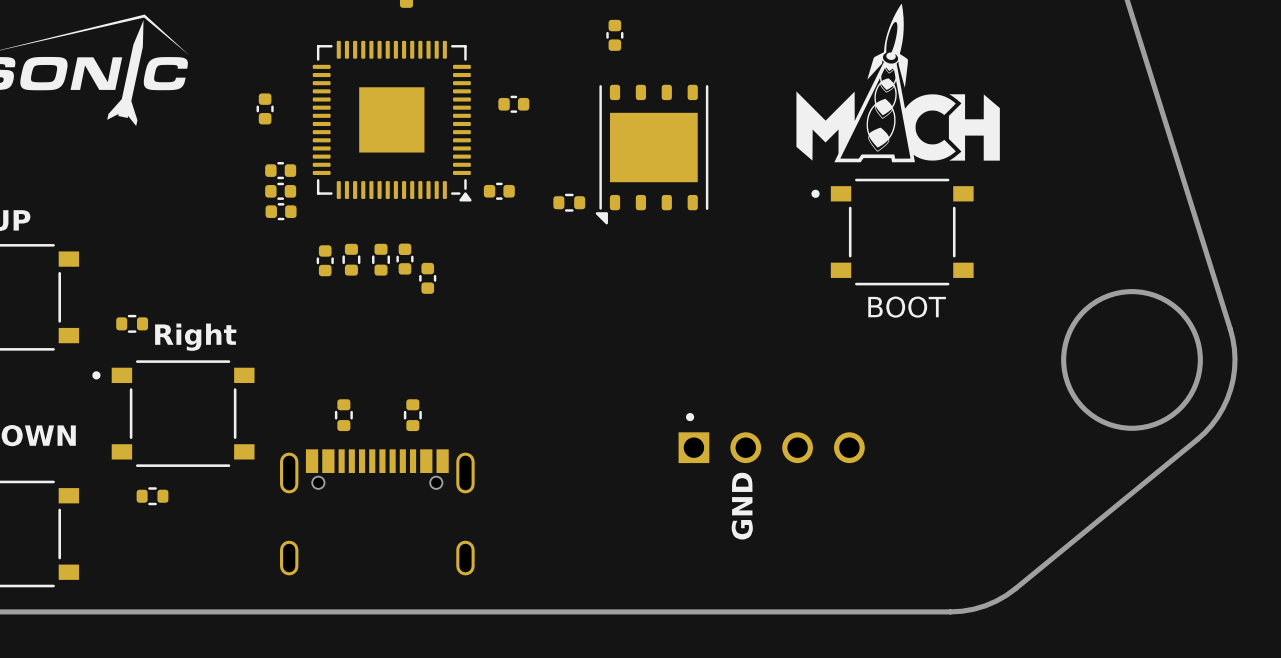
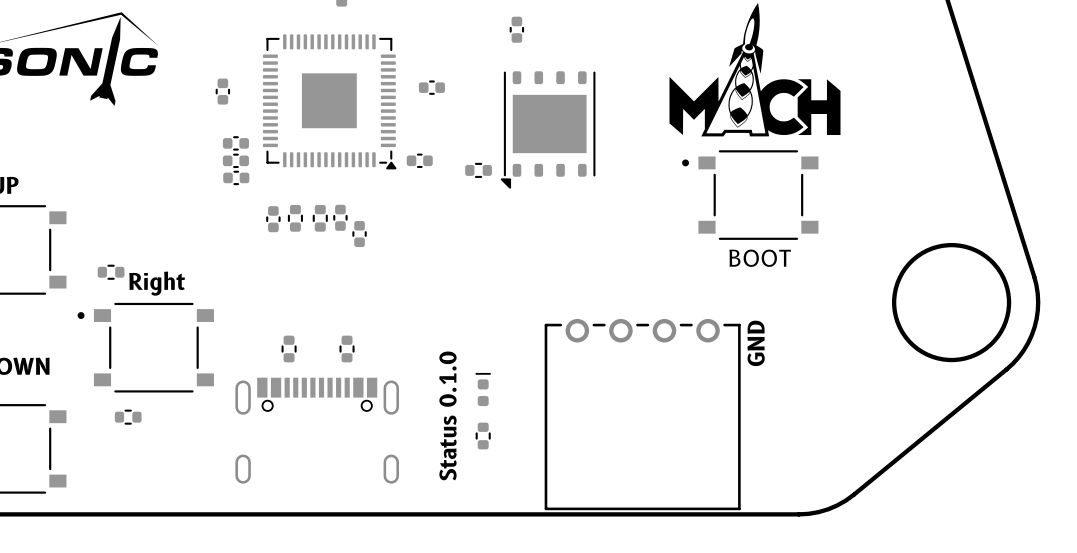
part: (771, 438) -> none
part: none -> (483, 389)
text: none -> Status 0.1.0 (447, 415)
part: none -> (642, 414)
text position: GND (742, 506) -> GND (756, 343)
part: none -> (483, 436)

